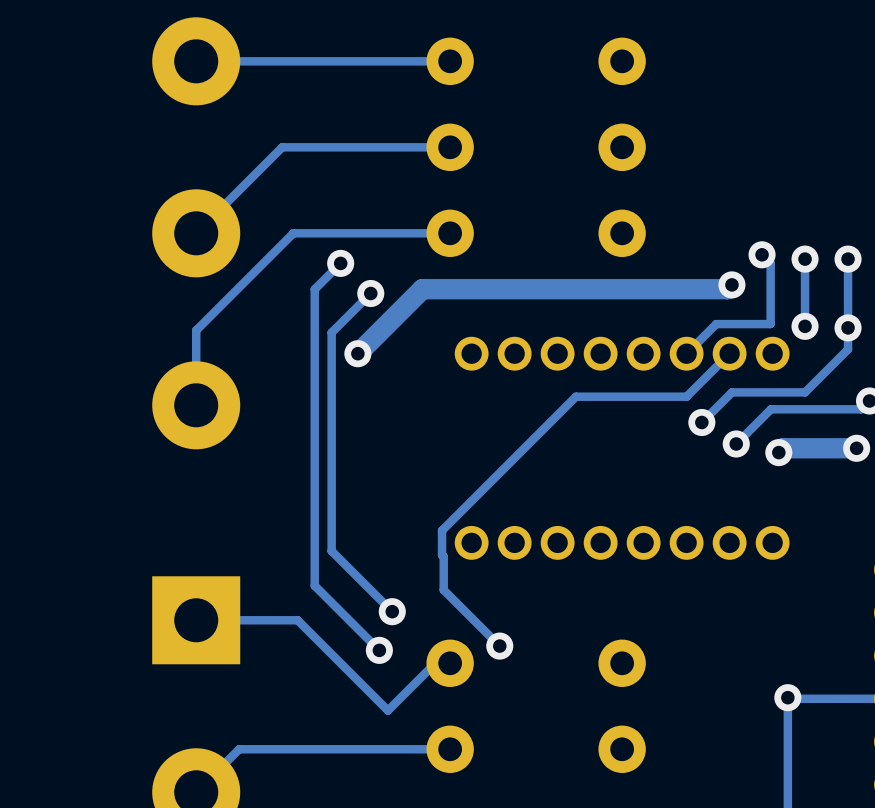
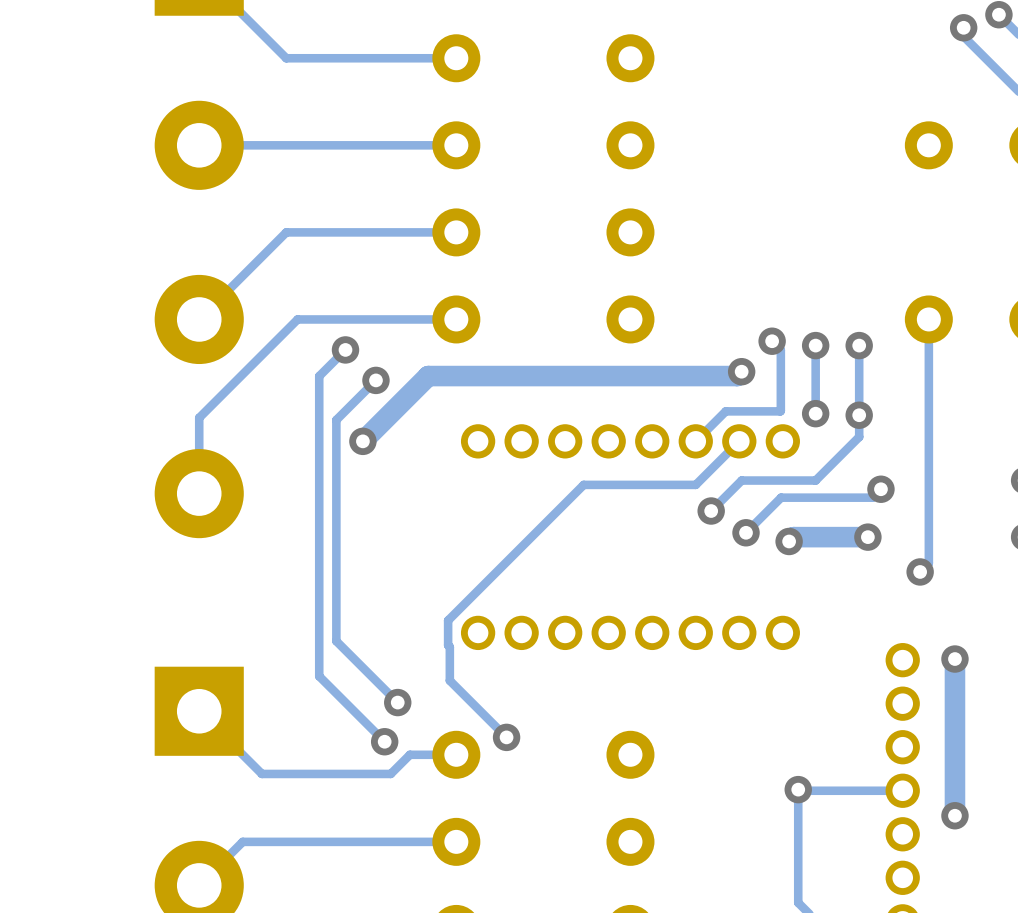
track: (196, 620) (297, 620) (387, 710) (435, 663) -> (199, 711) (261, 773) (390, 773) (409, 754) (441, 754)

